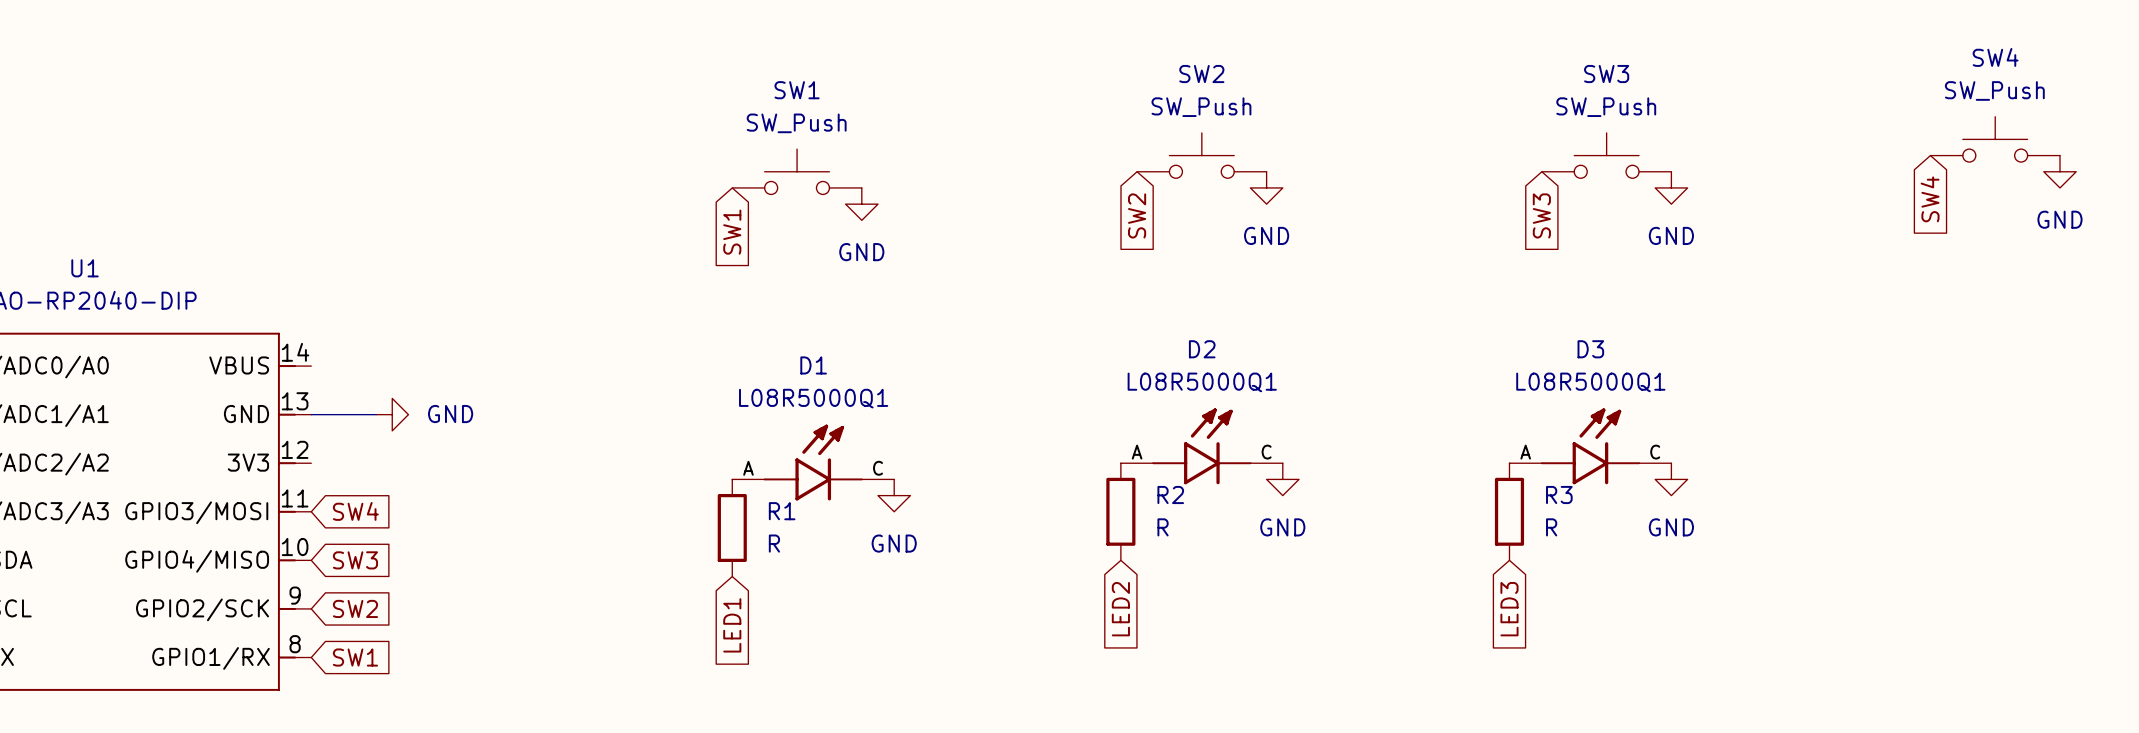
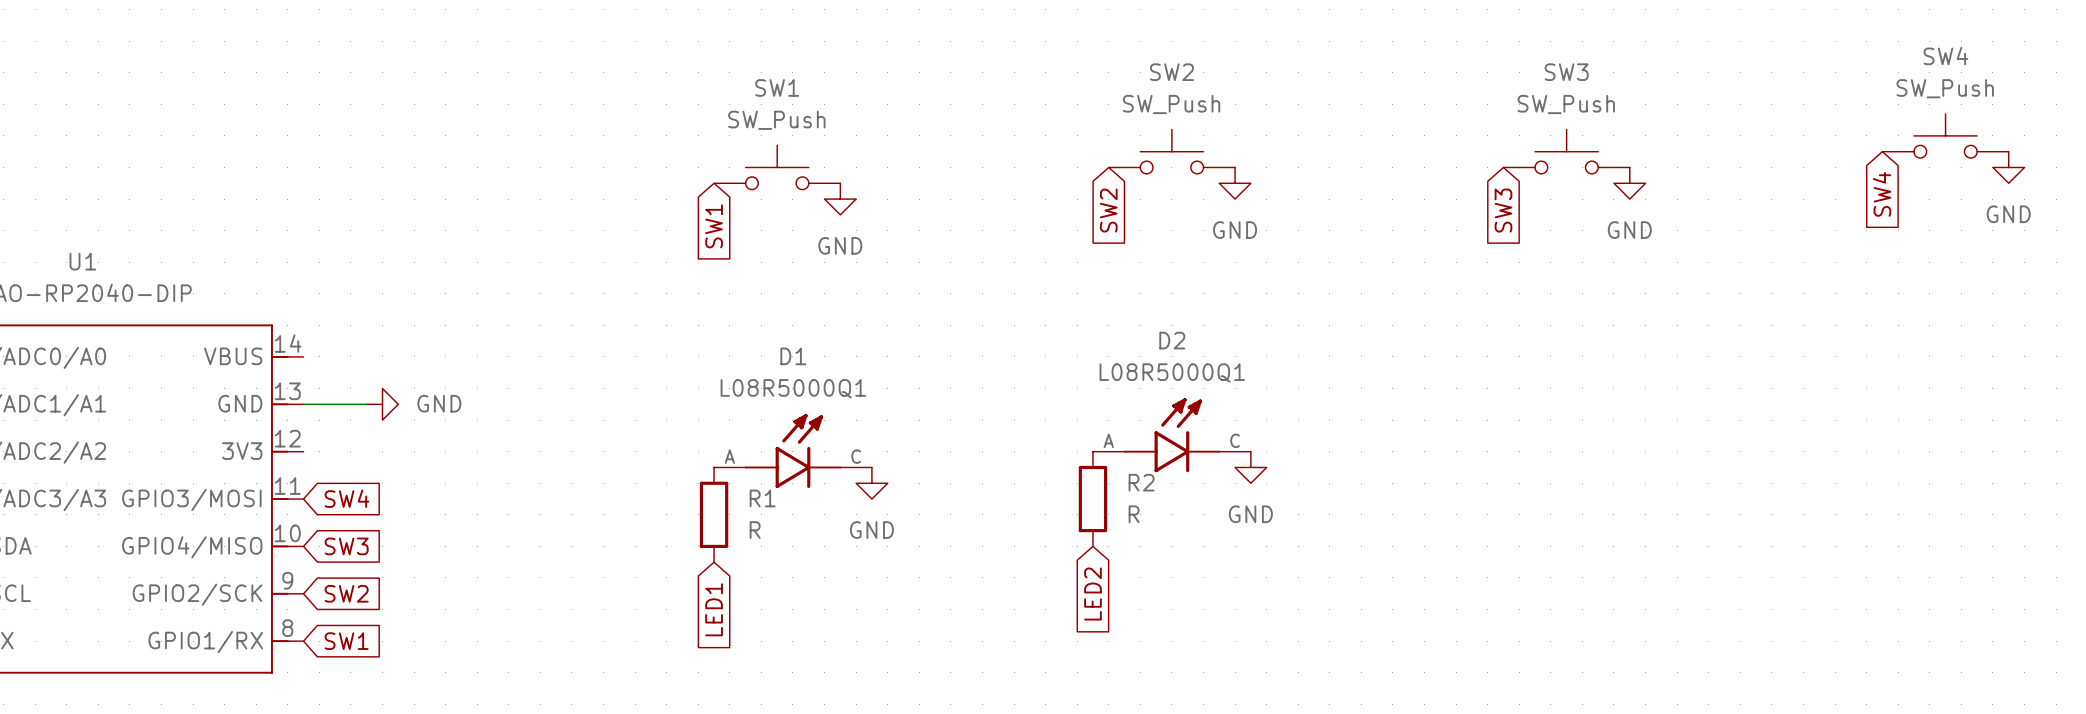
D3: L08R5000Q1 (1590, 446) -> none
power symbol: GND (1671, 479) -> none
R3: R (1509, 511) -> none
global label: LED3 (1509, 609) -> none

